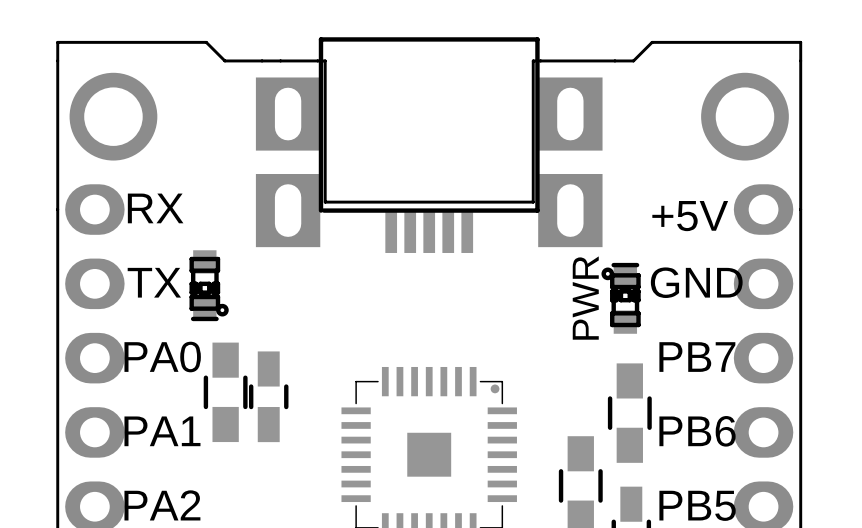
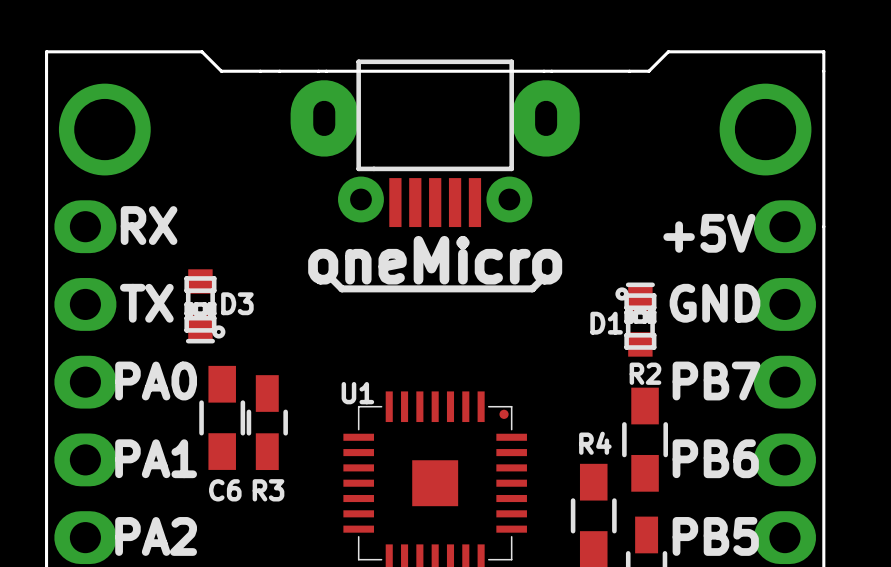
part footprint: [255, 37, 603, 253] -> [290, 59, 580, 228]
board edge: (325, 60) (325, 202) (533, 202) (533, 60) -> (326, 71) (544, 71)
text: none -> oneMicro (435, 260)
line: none -> (330, 277) (341, 288) (532, 288) (544, 277)
D3 name: none -> D3 (237, 303)
text: PWR (585, 298) -> none
D1 name: none -> D1 (606, 323)
R2 name: none -> R2 (645, 373)
U1 name: none -> U1 (357, 393)
R4 name: none -> R4 (595, 443)
C6 name: none -> C6 (225, 490)
R3 name: none -> R3 (268, 490)

